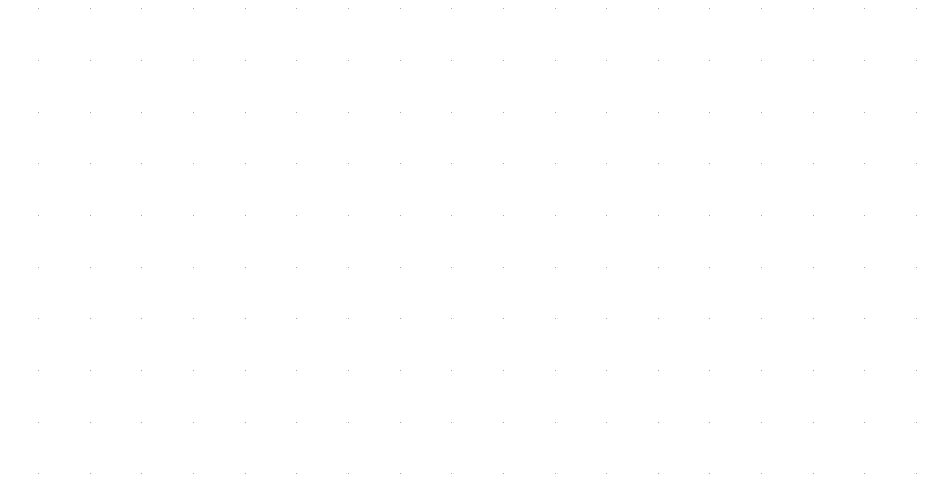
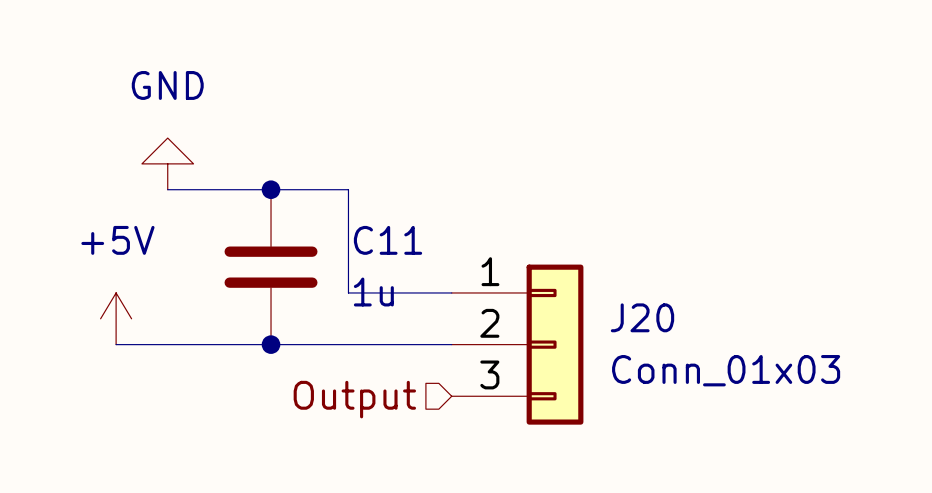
power symbol: none -> GND (167, 163)
wire: none -> (167, 189) (348, 189) (348, 292) (451, 292)
junction: none -> (271, 189)
C11: none -> 1u (271, 267)
power symbol: none -> +5V (116, 318)
wire: none -> (116, 344) (451, 344)
junction: none -> (271, 344)
J20: none -> Conn_01x03 (517, 344)
hierarchical label: none -> Output (354, 399)

